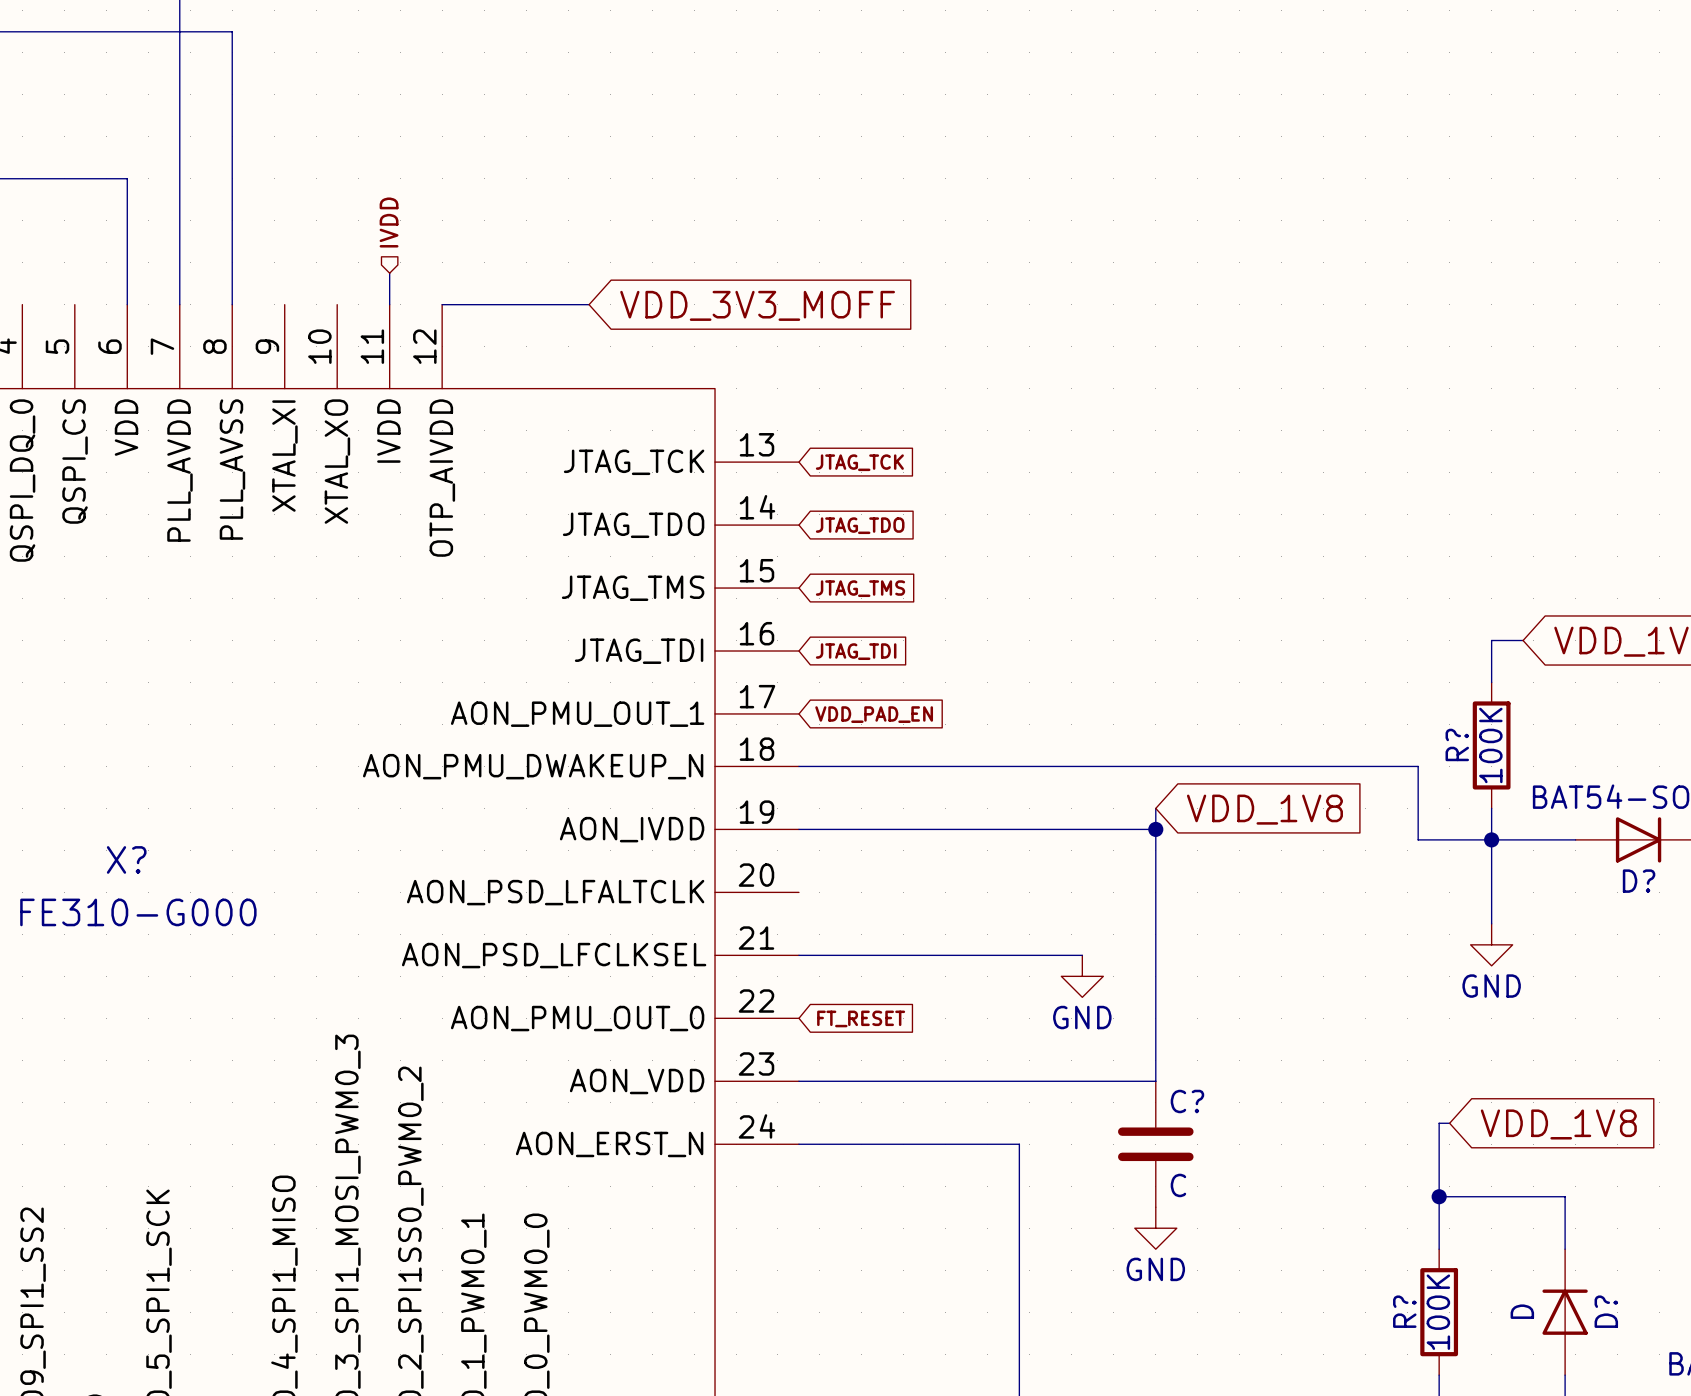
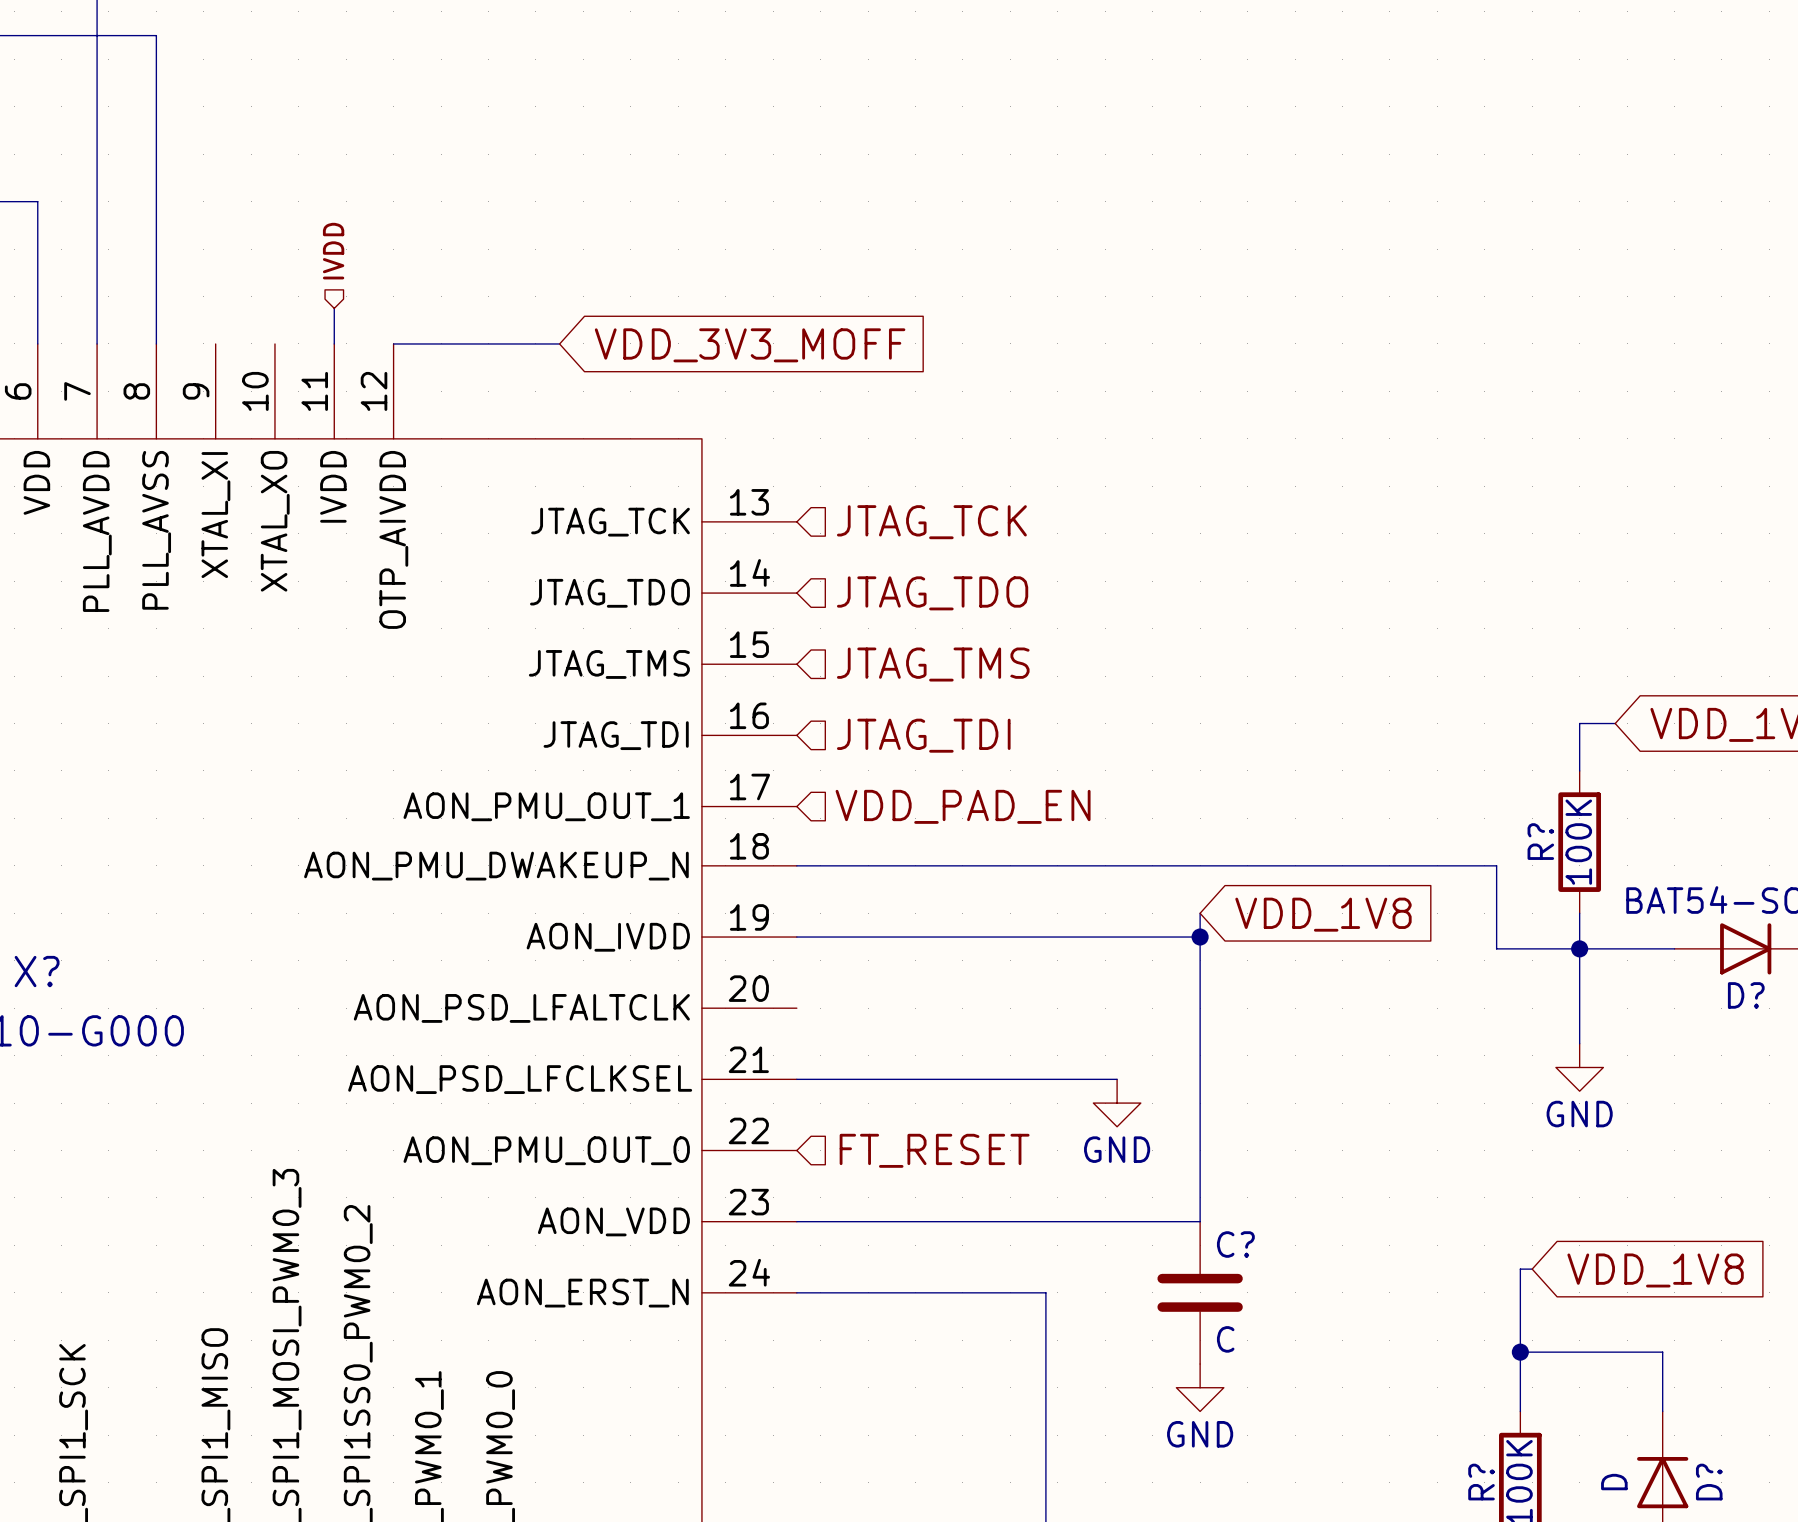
global label: JTAG_TCK (859, 462) -> none
hierarchical label: none -> JTAG_TCK (931, 522)
global label: JTAG_TDO (860, 525) -> none
hierarchical label: none -> JTAG_TDO (932, 593)
global label: JTAG_TMS (860, 588) -> none
hierarchical label: none -> JTAG_TMS (933, 664)
global label: JTAG_TDI (856, 651) -> none
hierarchical label: none -> JTAG_TDI (923, 735)
global label: VDD_PAD_EN (874, 714) -> none
hierarchical label: none -> VDD_PAD_EN (963, 806)
global label: FT_RESET (861, 1018) -> none
hierarchical label: none -> FT_RESET (934, 1150)

